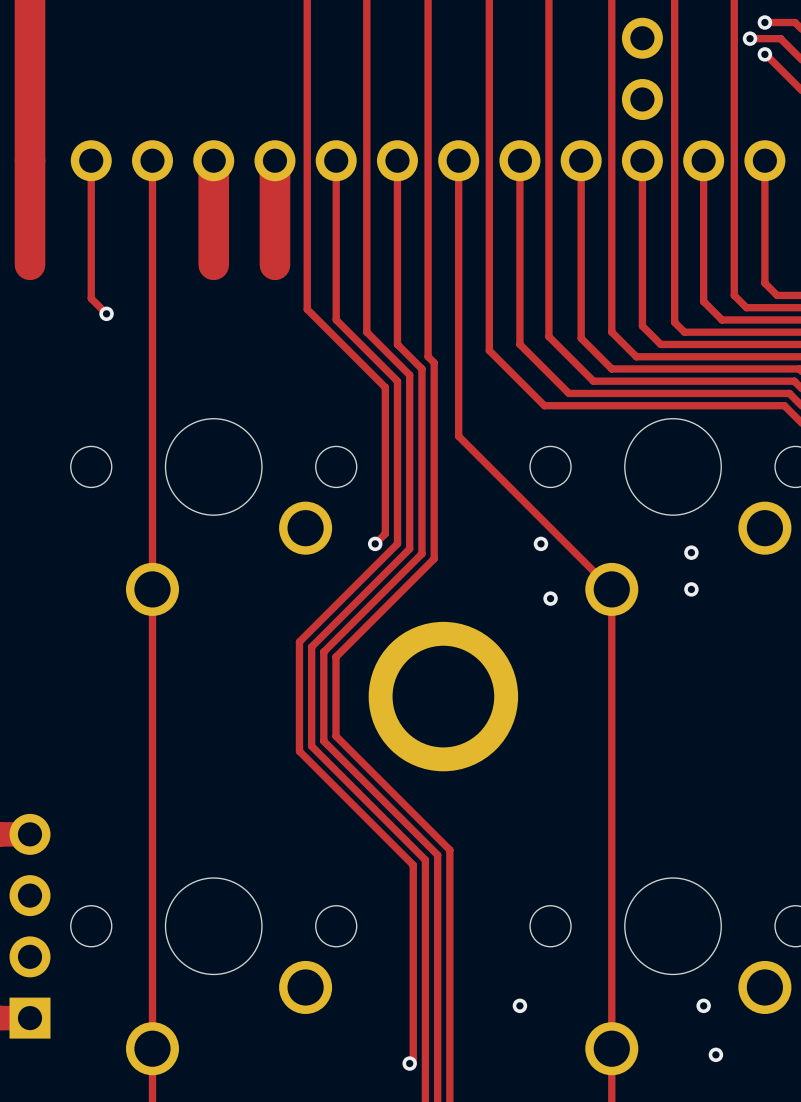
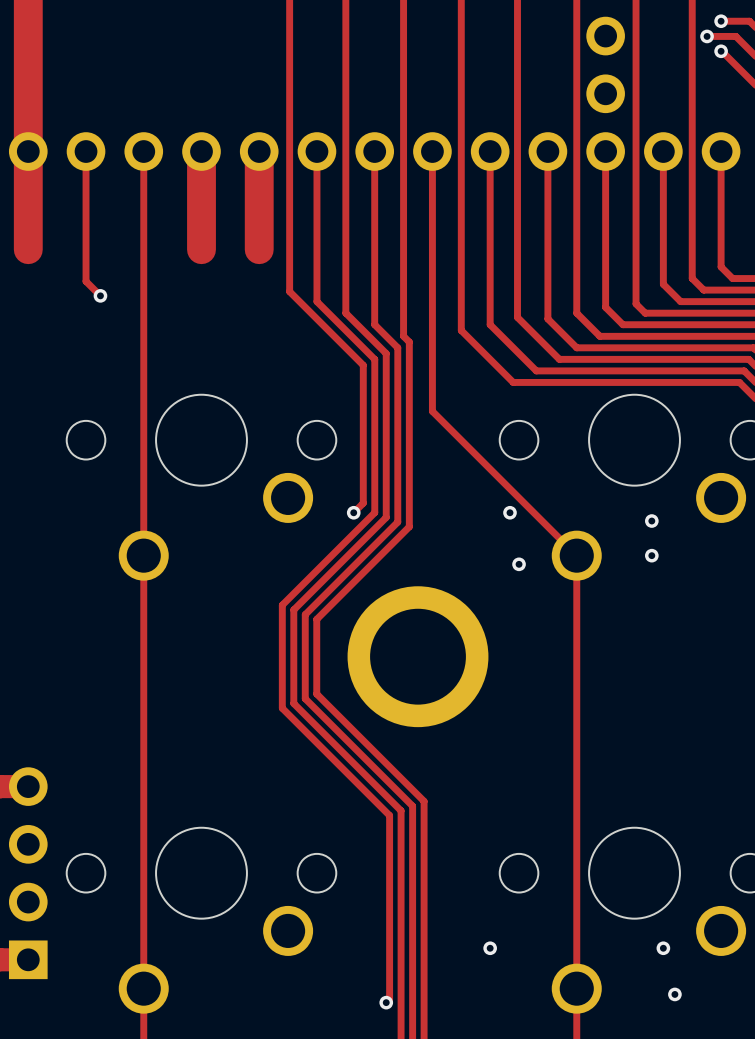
part: none -> (374, 151)

